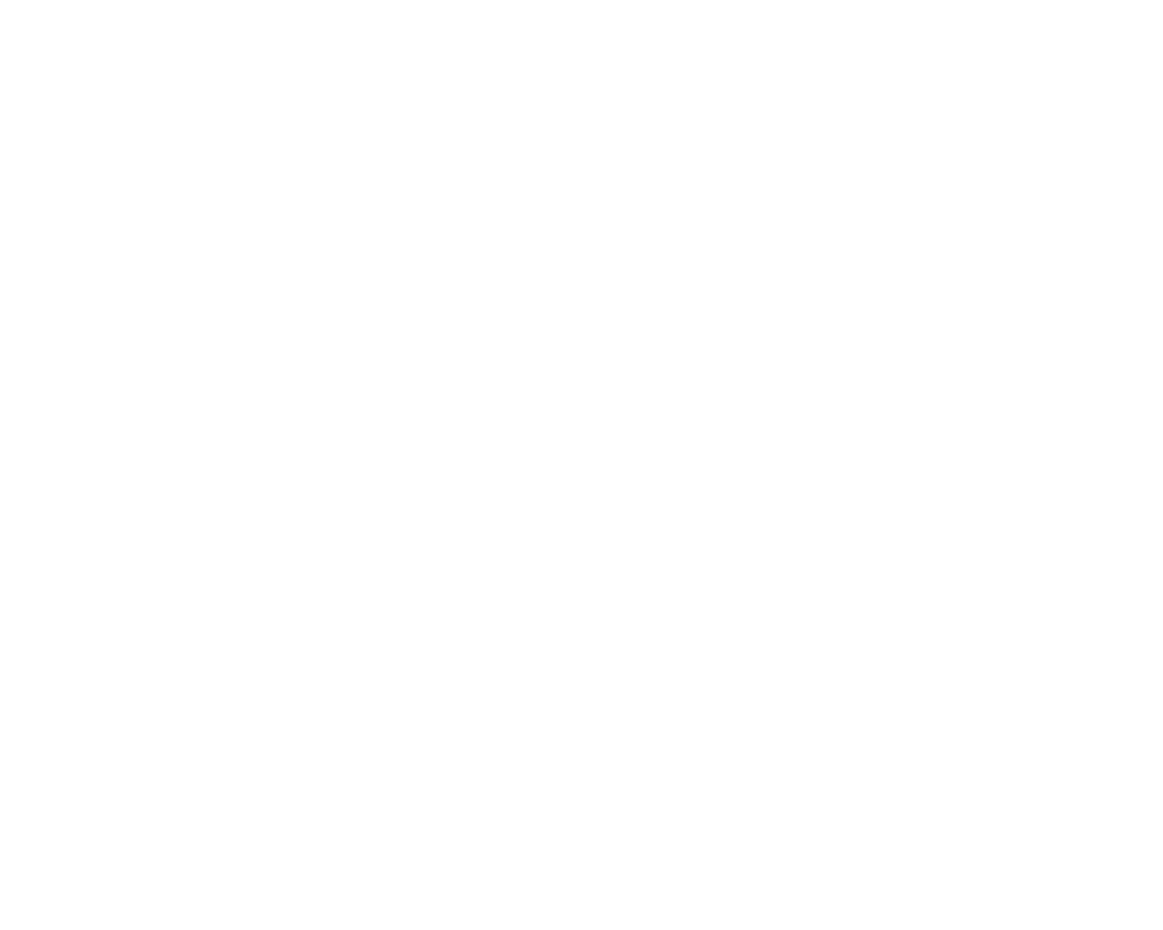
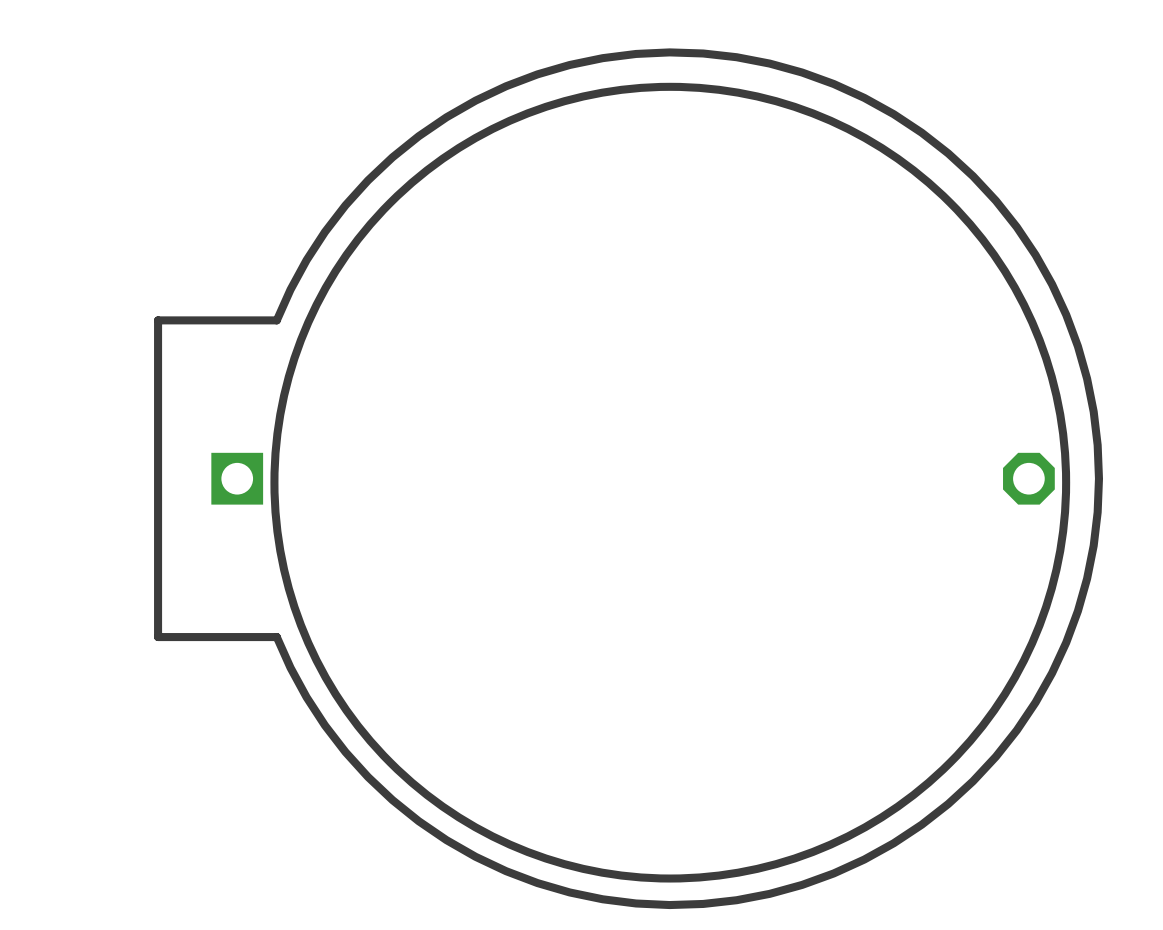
part: none -> (628, 478)

